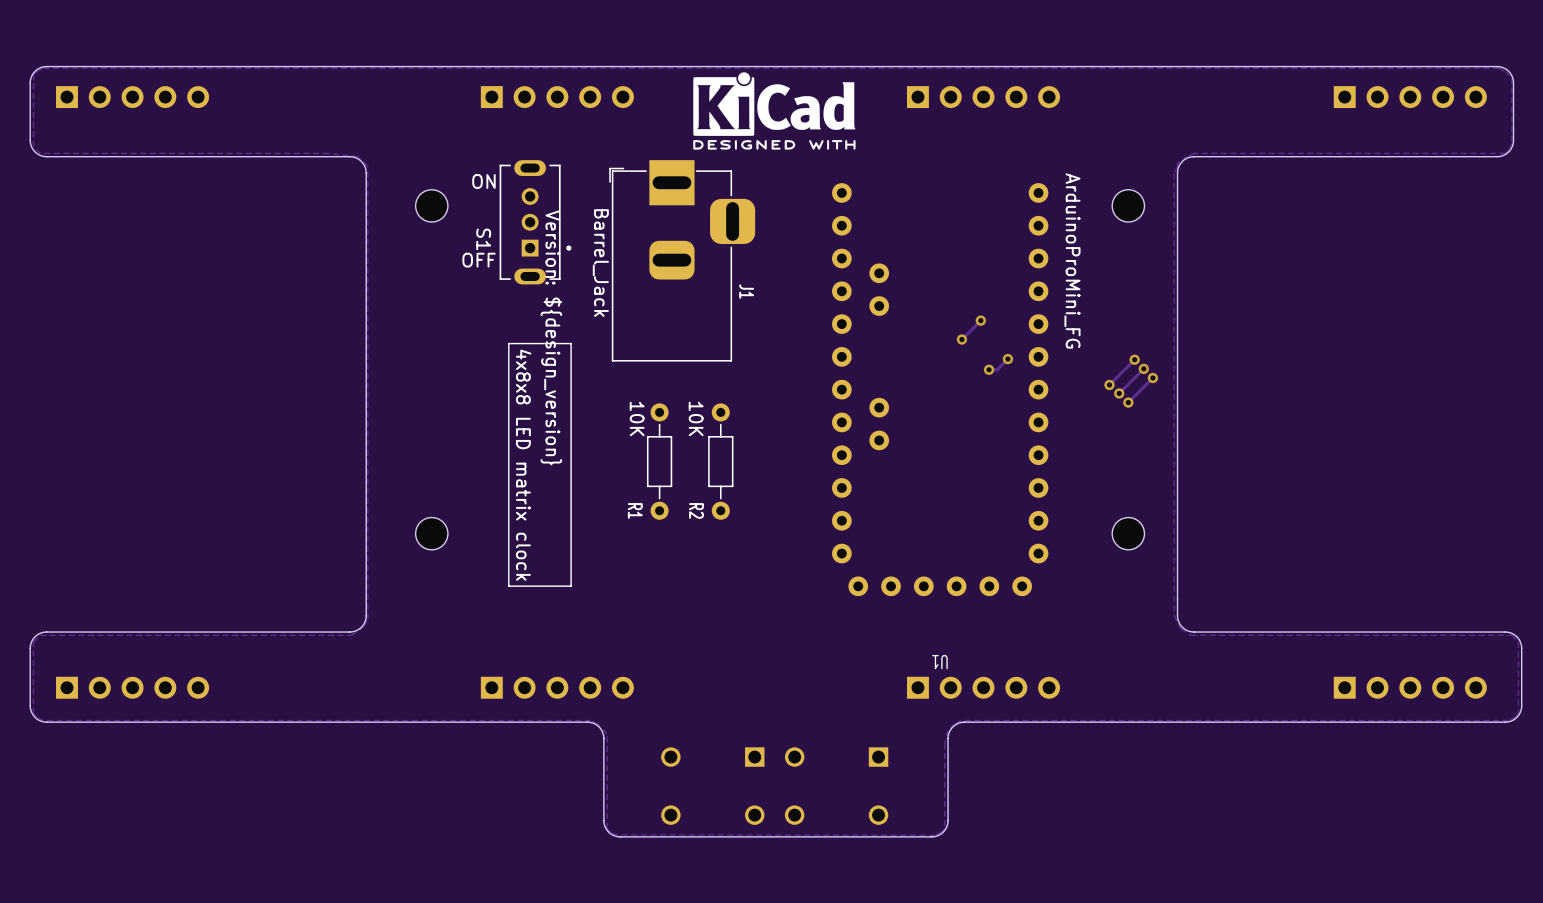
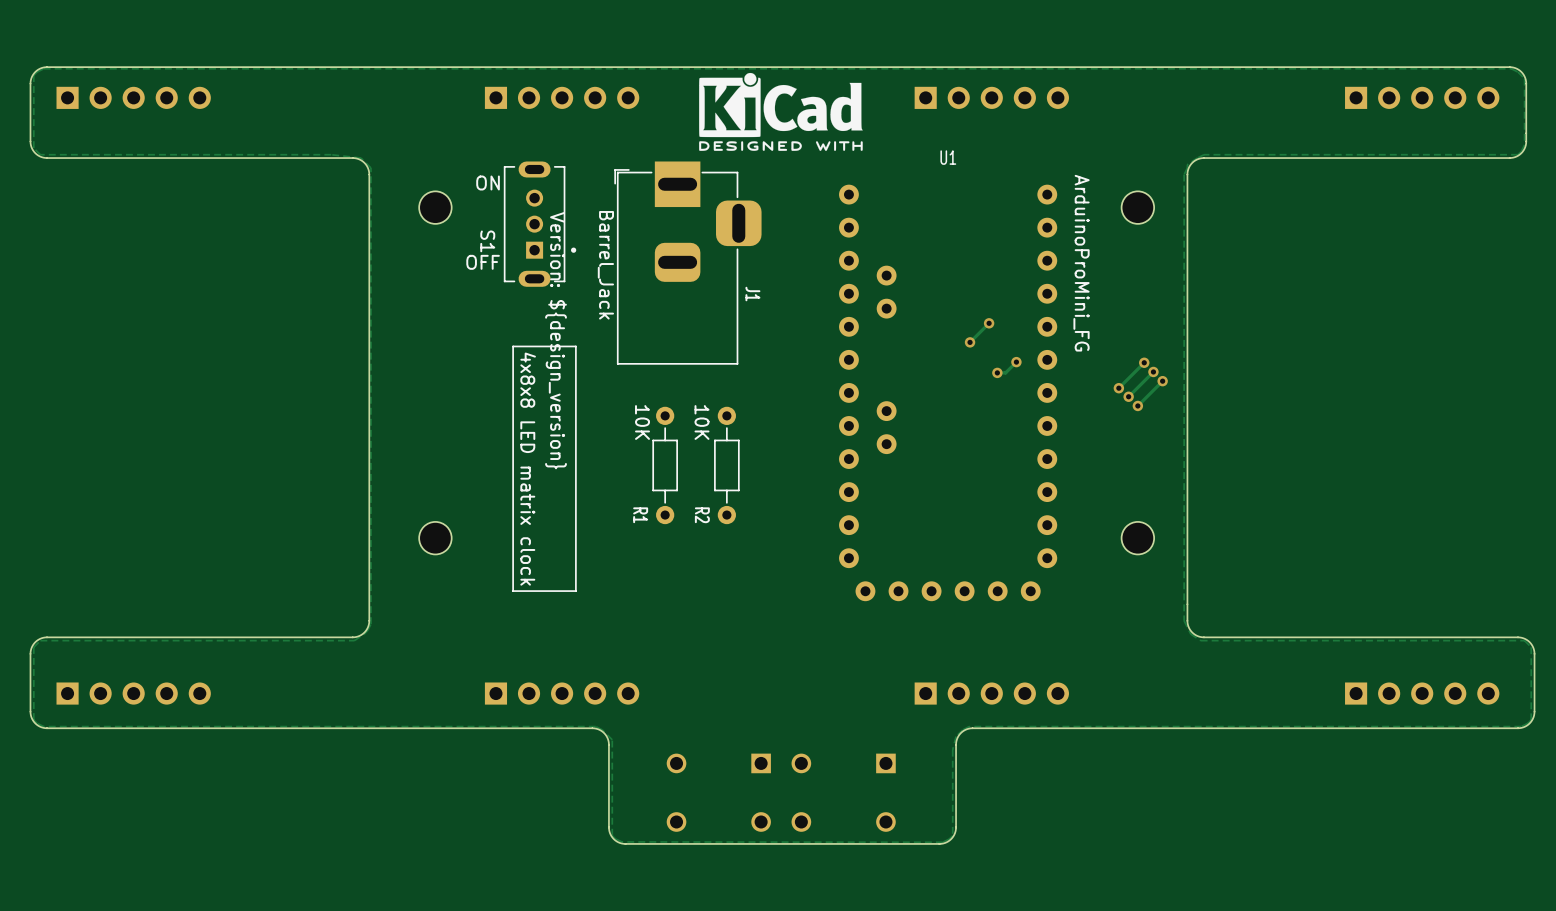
U1 name rotation: 0° (939, 662) -> 180° (948, 157)
U1 name position: U1 (939, 662) -> U1 (948, 157)

